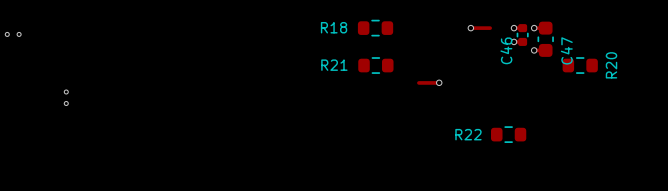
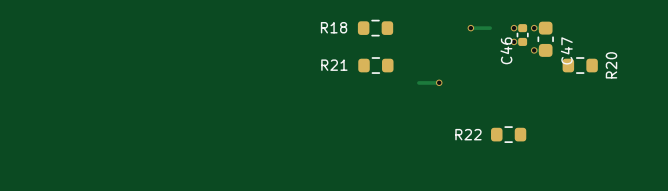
via: (7, 34) -> none
via: (19, 34) -> none
via: (66, 91) -> none
via: (66, 103) -> none

